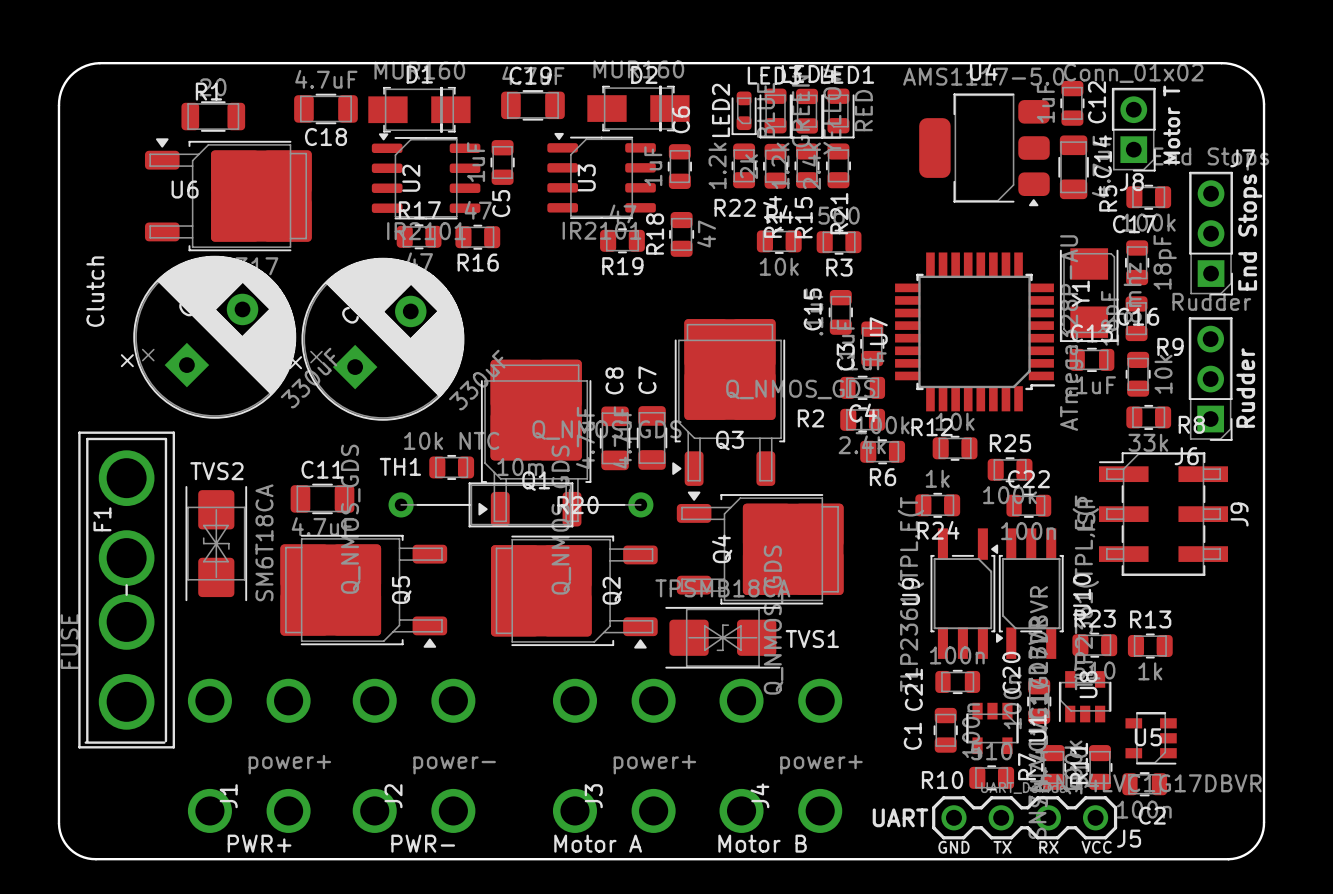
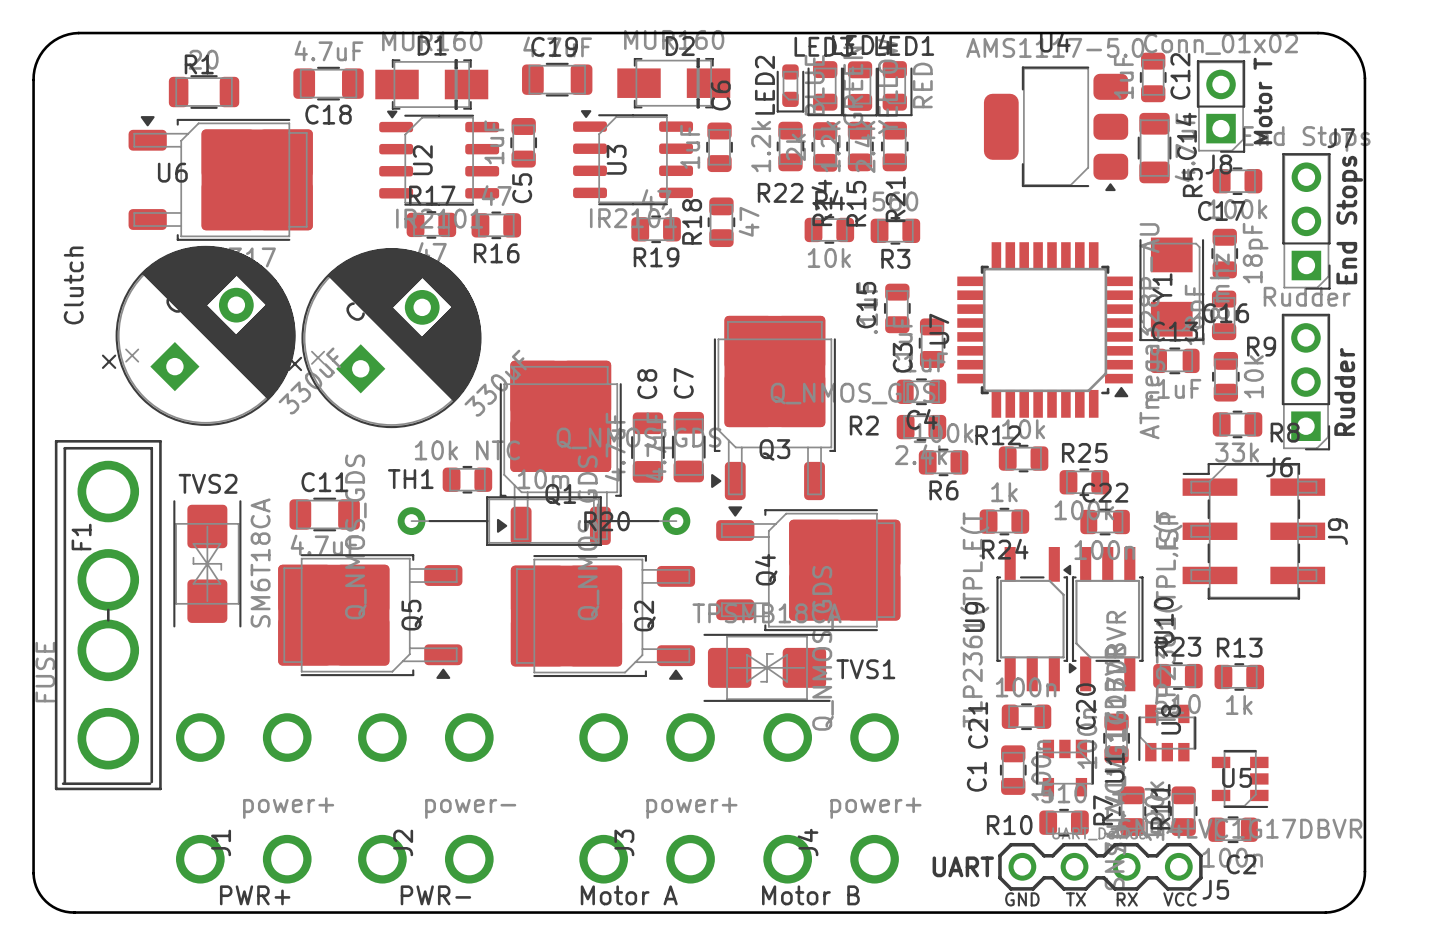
U7 footprint: [895, 252, 1056, 412] -> [957, 242, 1133, 418]

